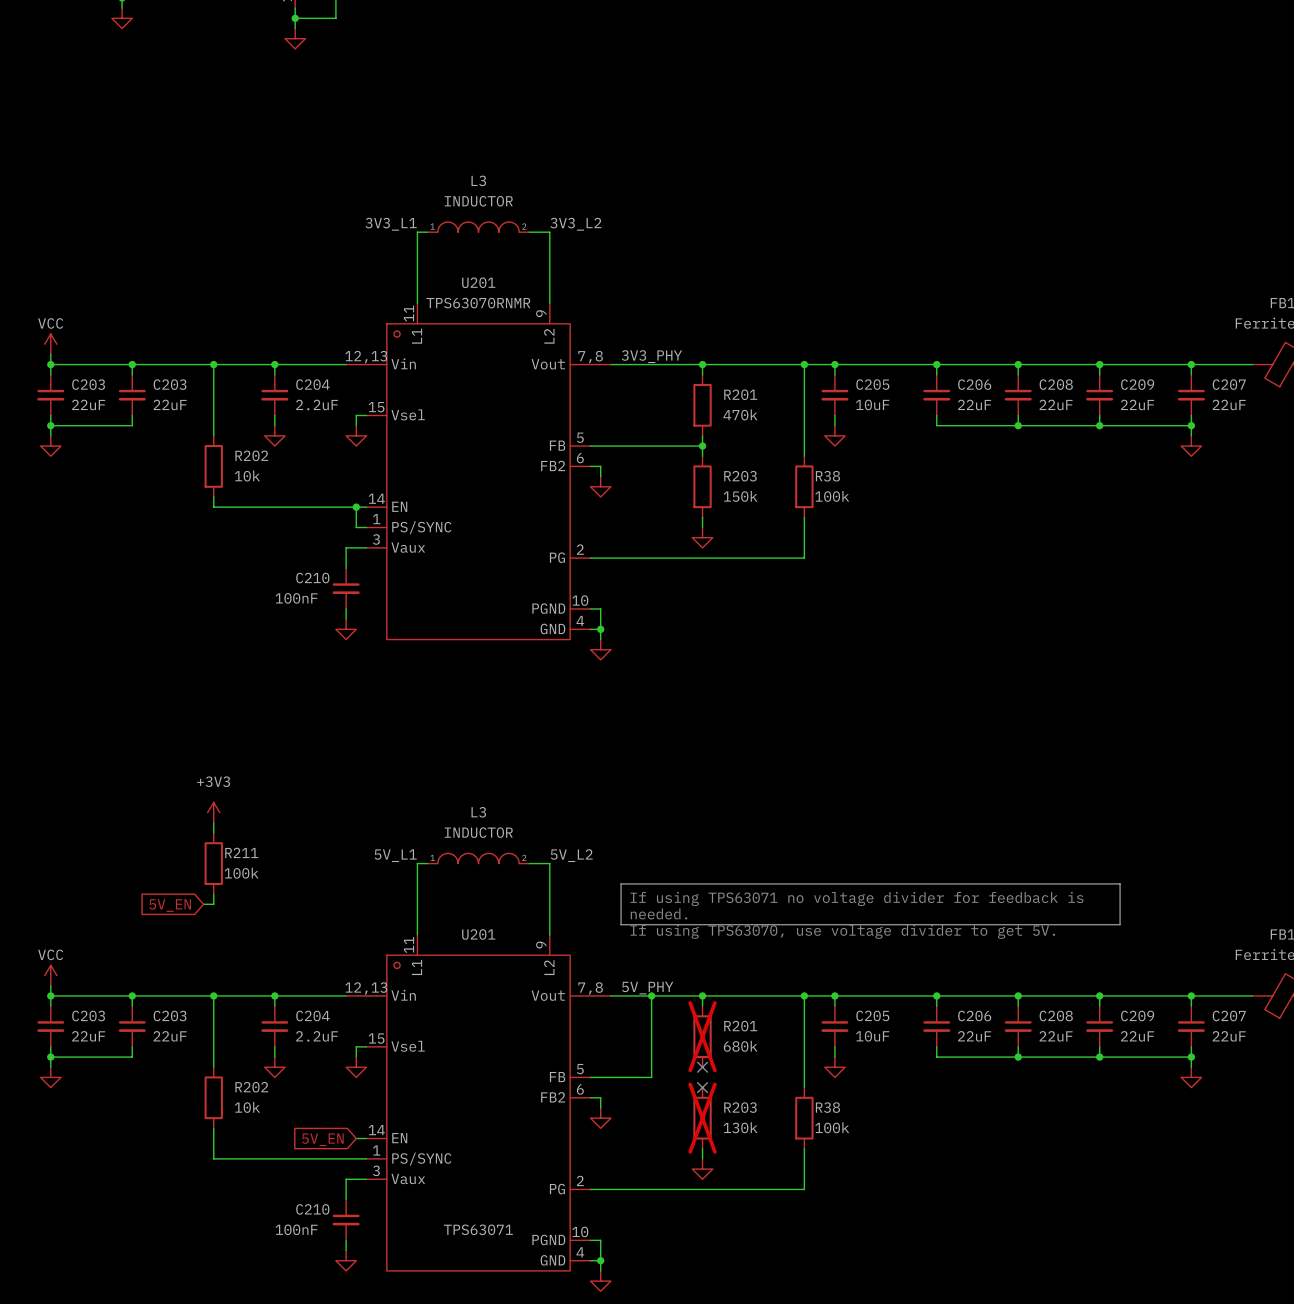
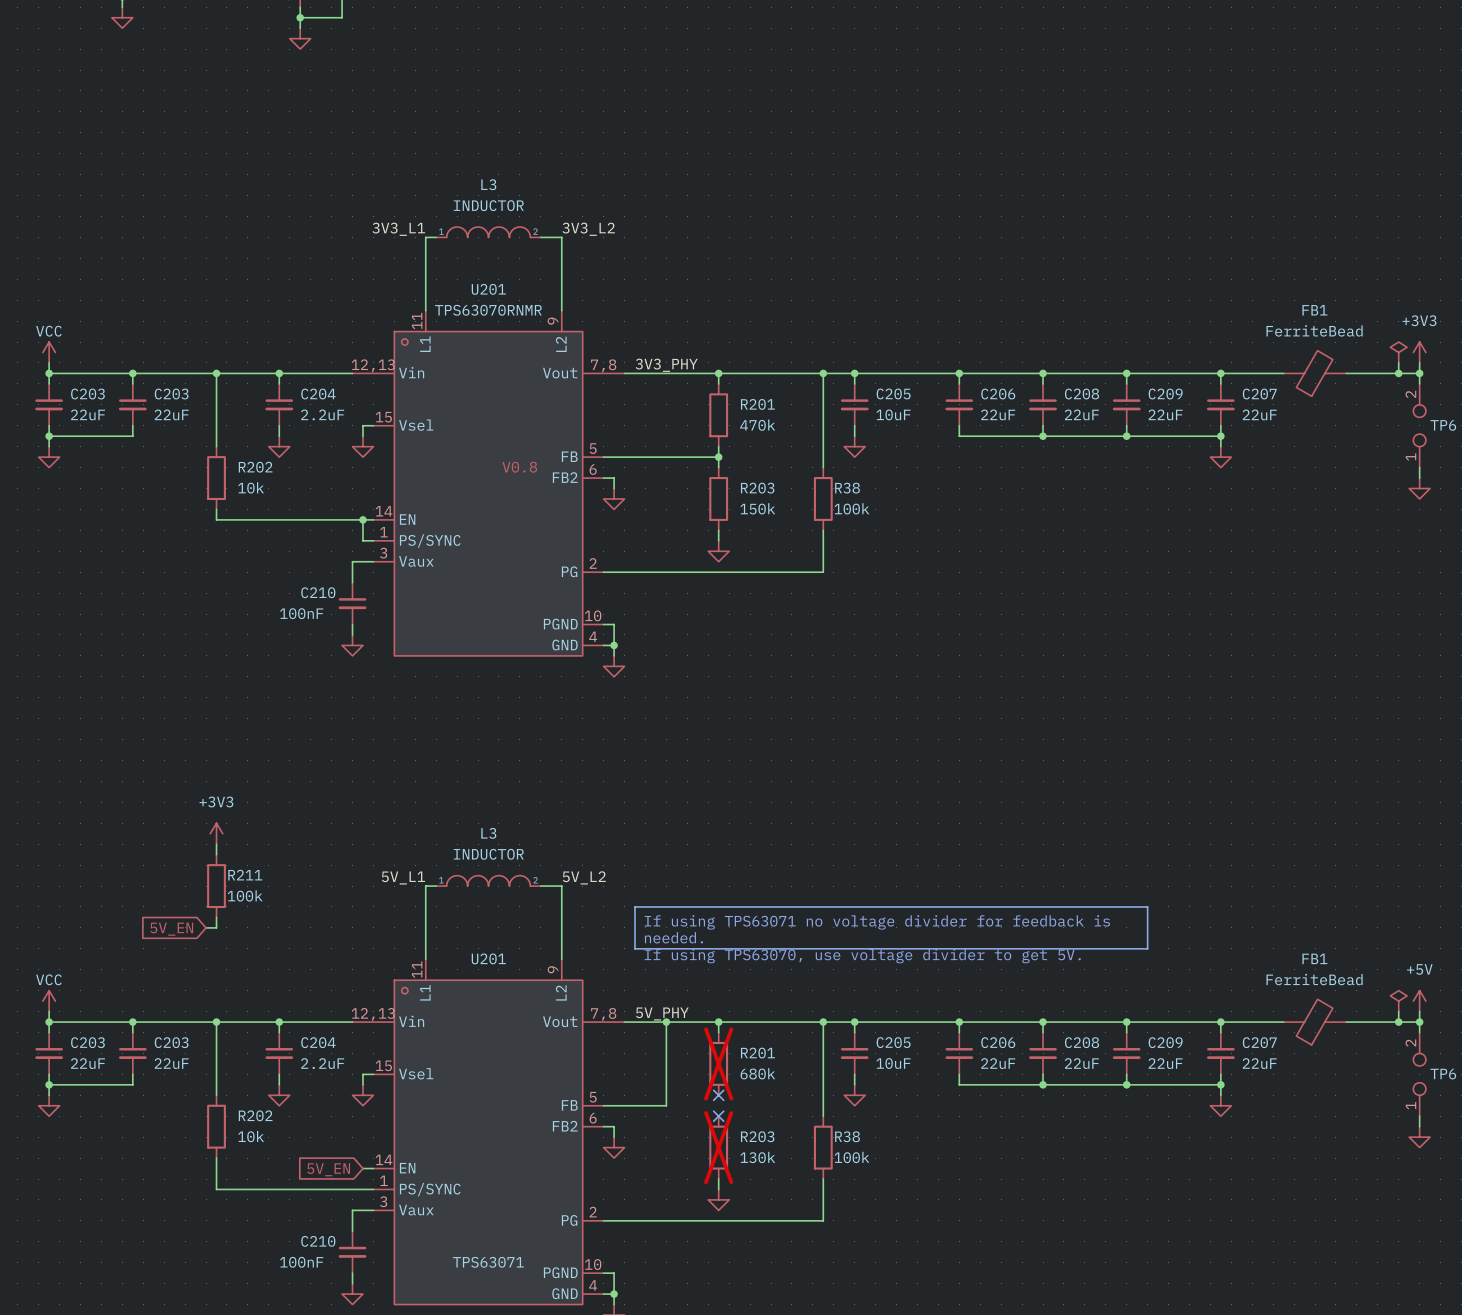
U201 text: none -> V0.8 (519, 467)

